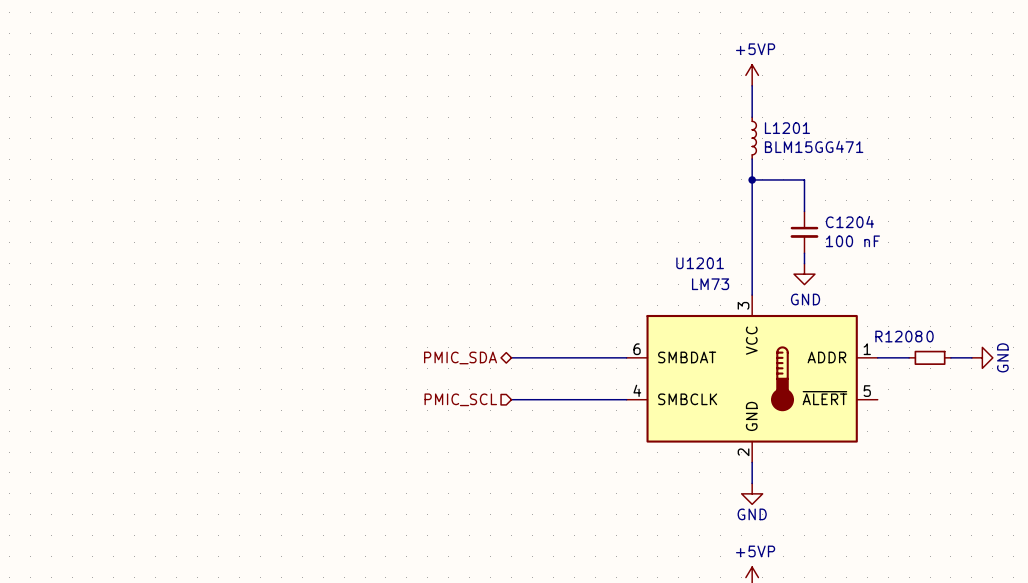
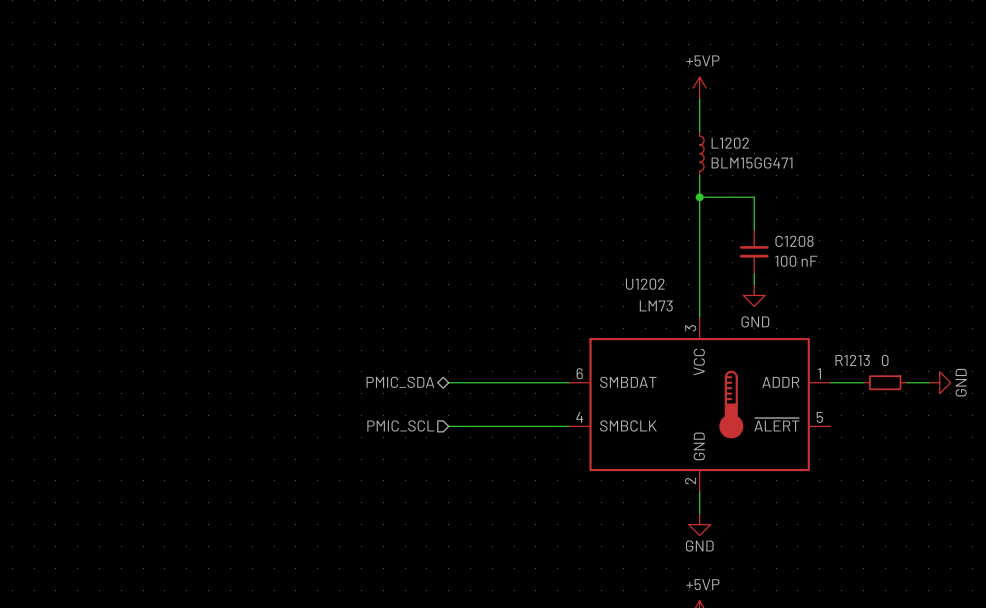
L1201 name: L1201 (787, 128) -> L1202 (730, 143)
C1204 name: C1204 (849, 222) -> C1208 (794, 241)
U1201 name: U1201 (700, 263) -> U1202 (645, 284)
R1208 name: R1208 (898, 336) -> R1213 (852, 360)

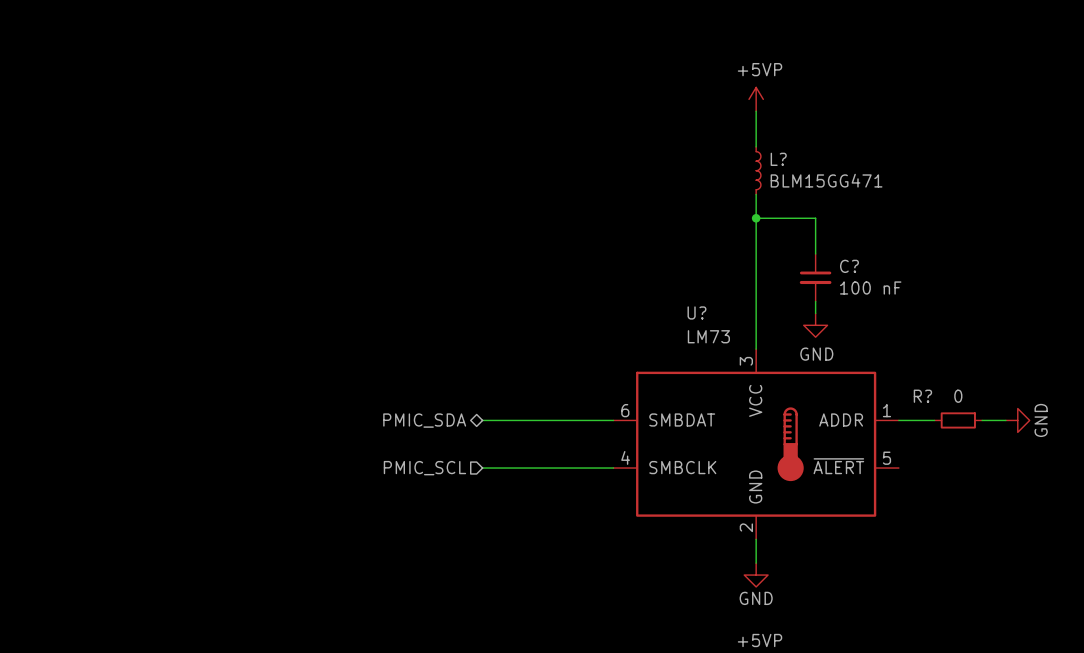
L1202 name: L1202 (730, 143) -> L? (778, 159)
C1208 name: C1208 (794, 241) -> C? (849, 266)
U1202 name: U1202 (645, 284) -> U? (696, 312)
R1213 name: R1213 (852, 360) -> R? (922, 396)

